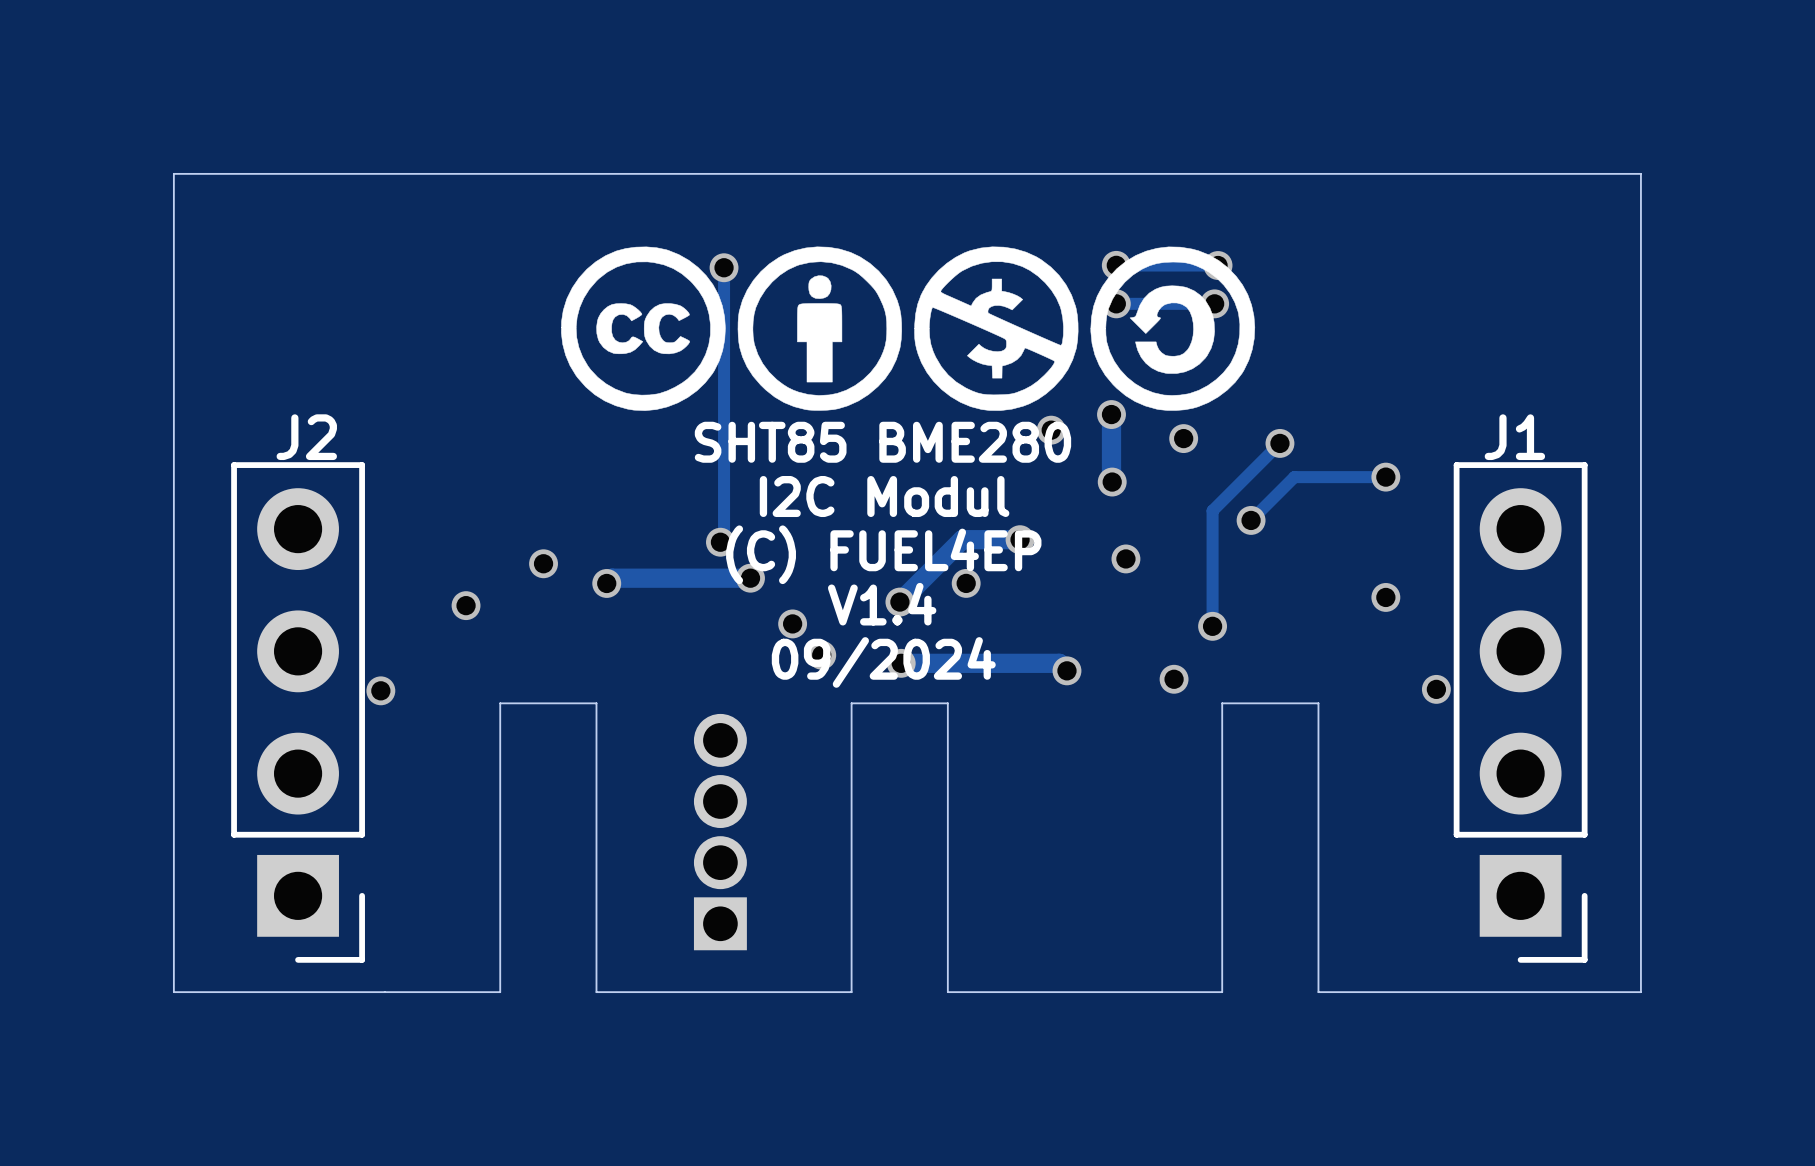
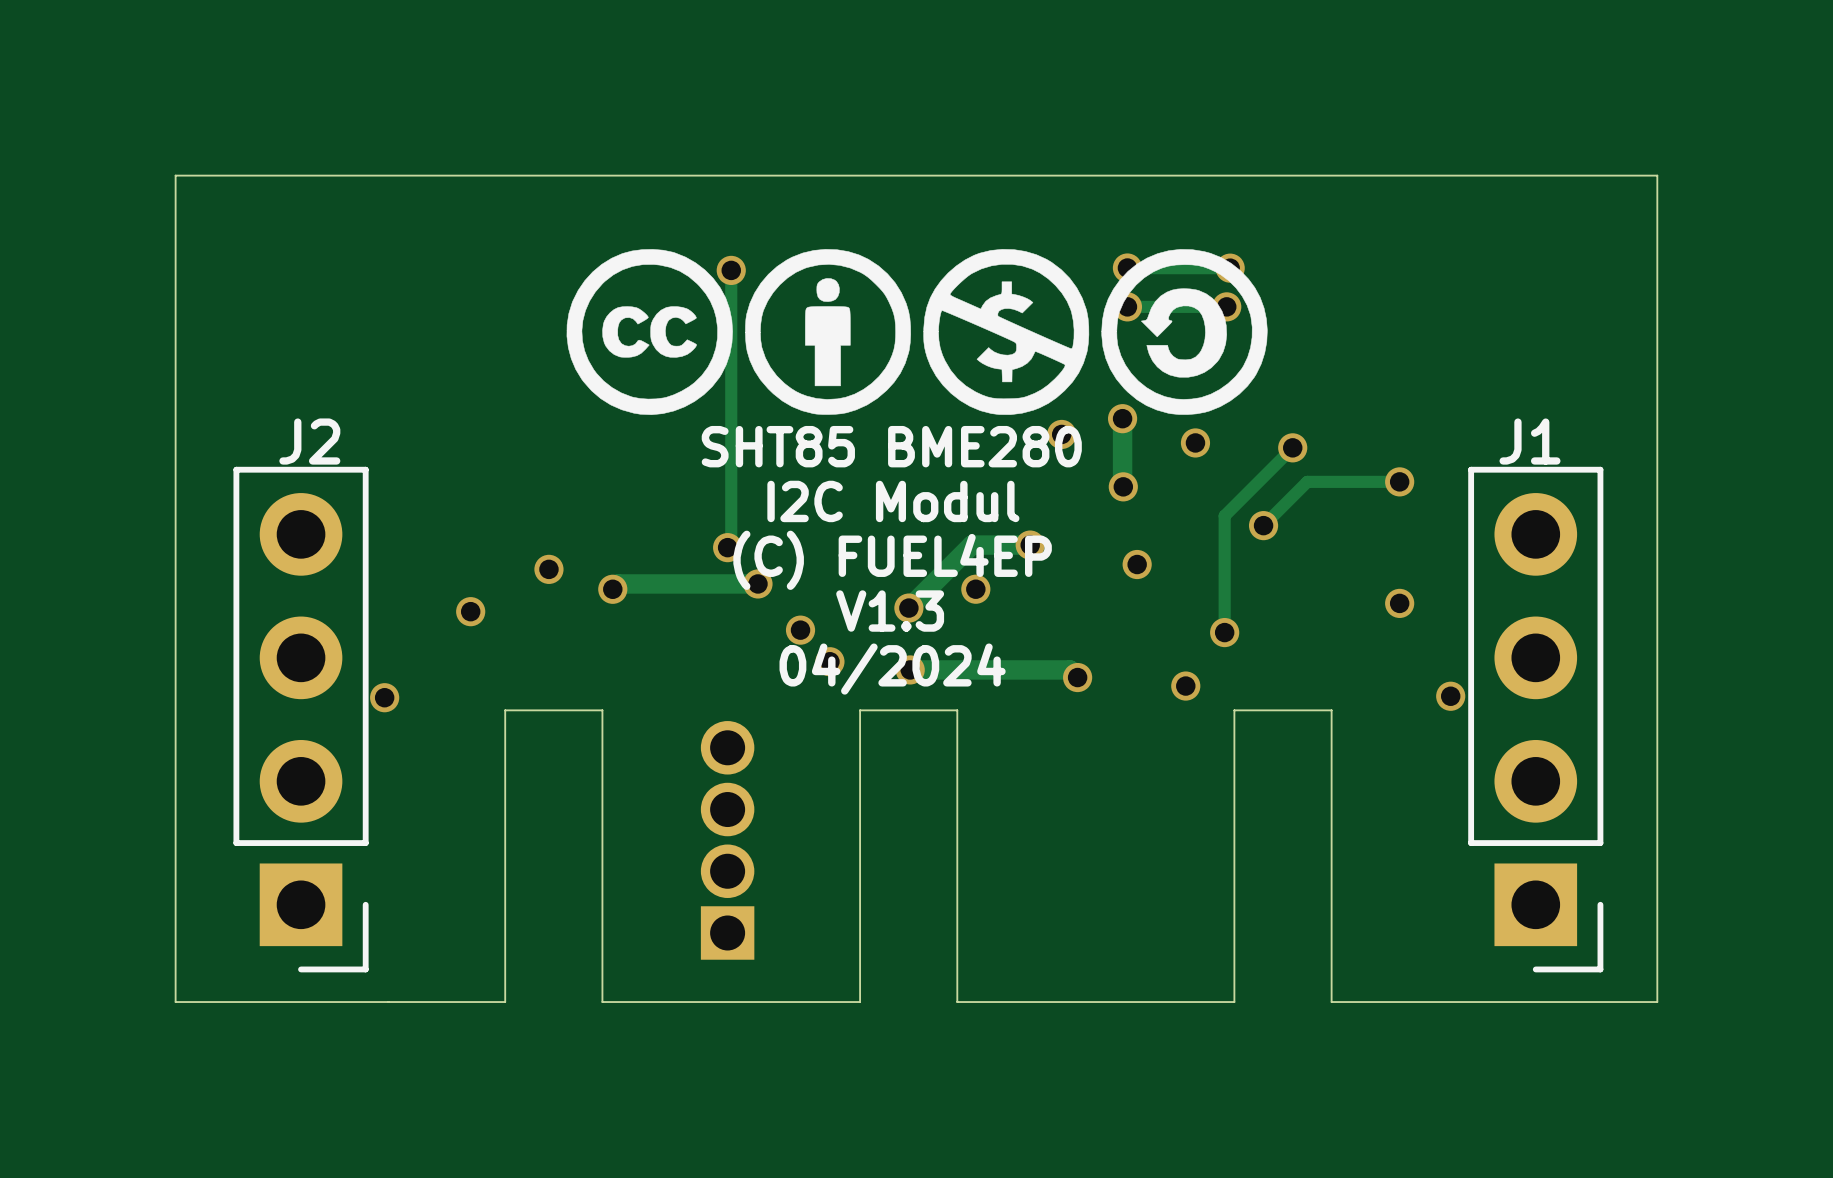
text: V1.4 (882, 604) -> V1.3 (890, 611)
text: 09/2024 (883, 662) -> 04/2024 (892, 669)

